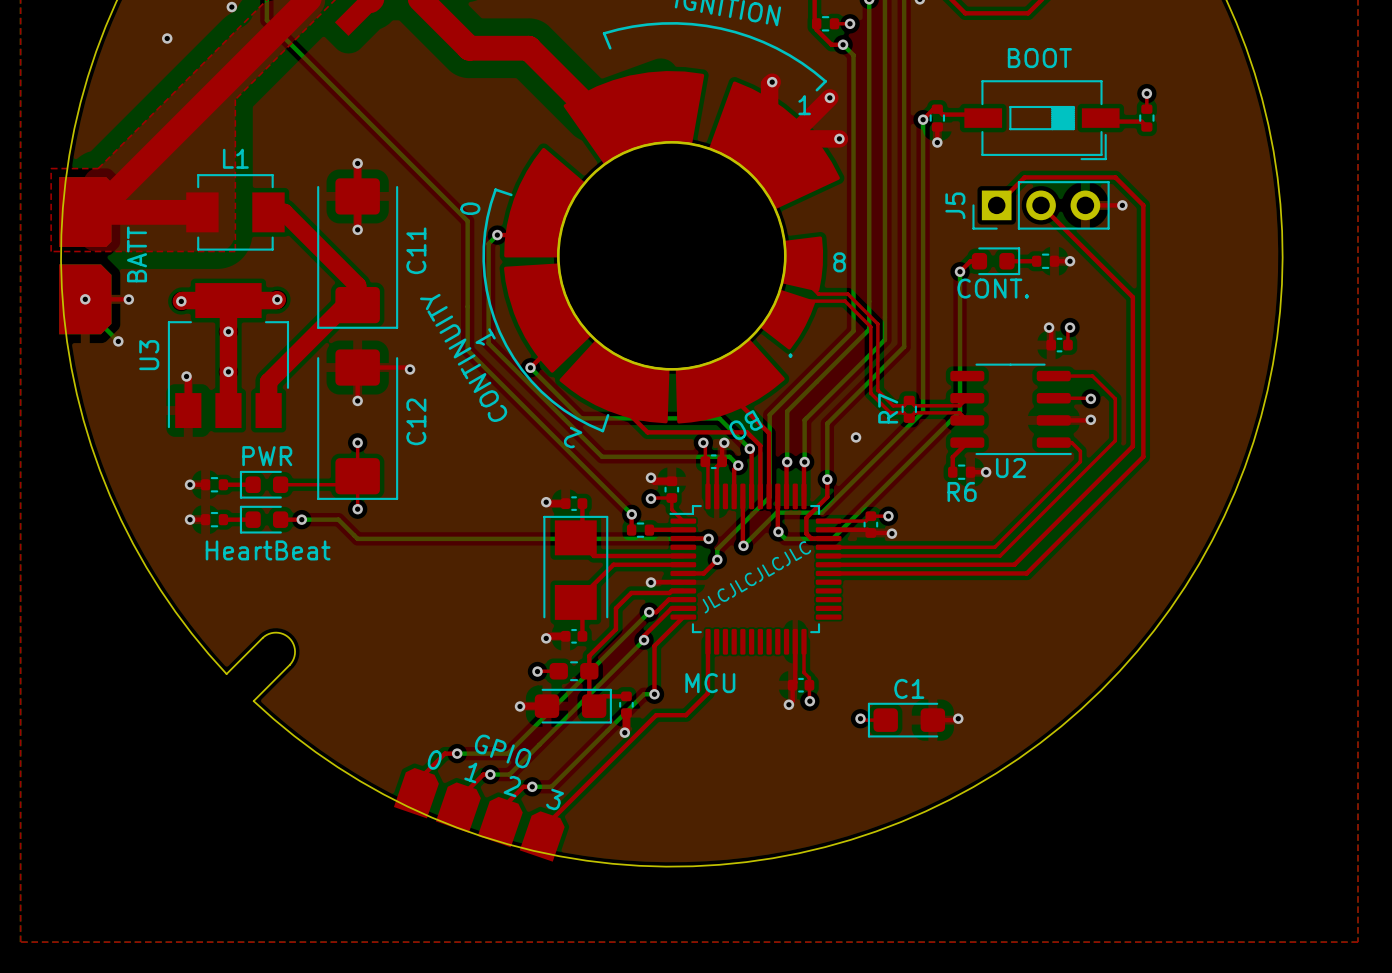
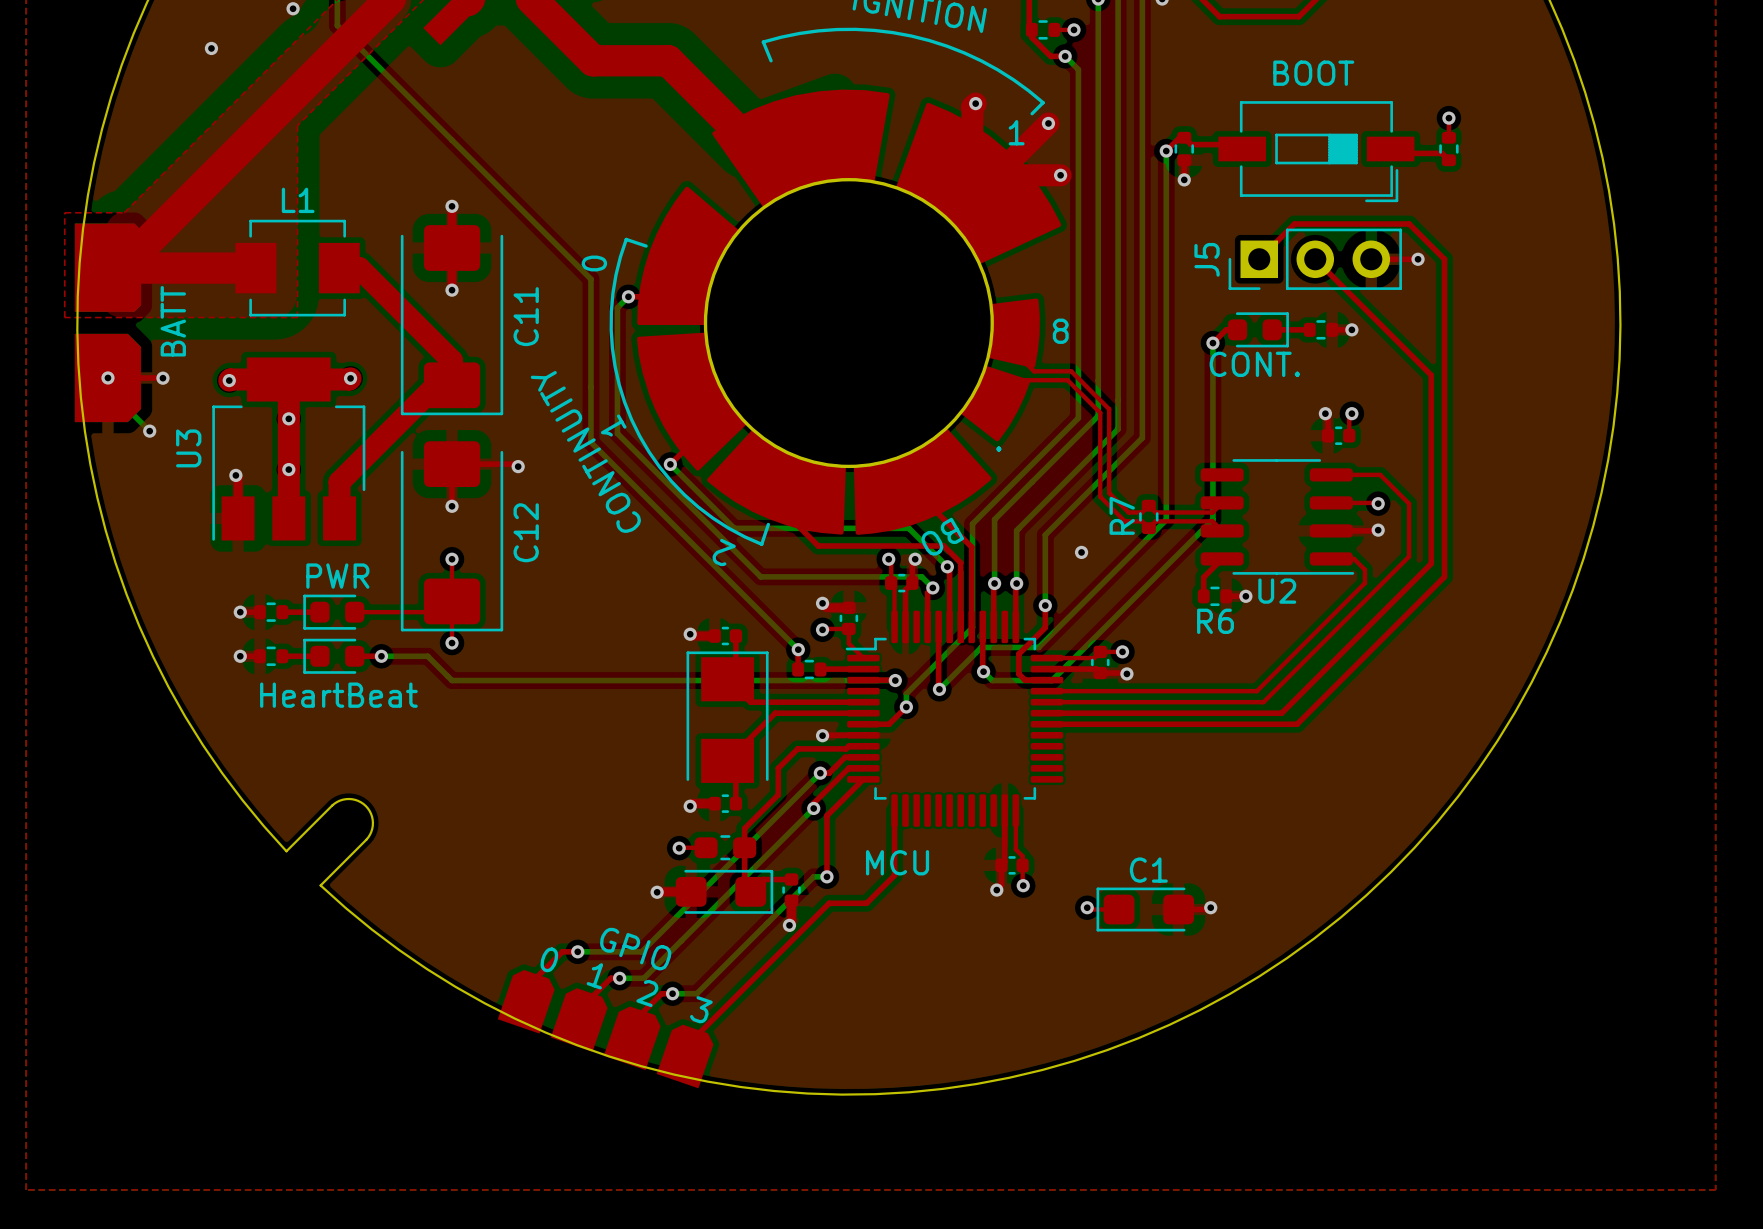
text: JLCJLCJLCJLC (756, 577) -> none

